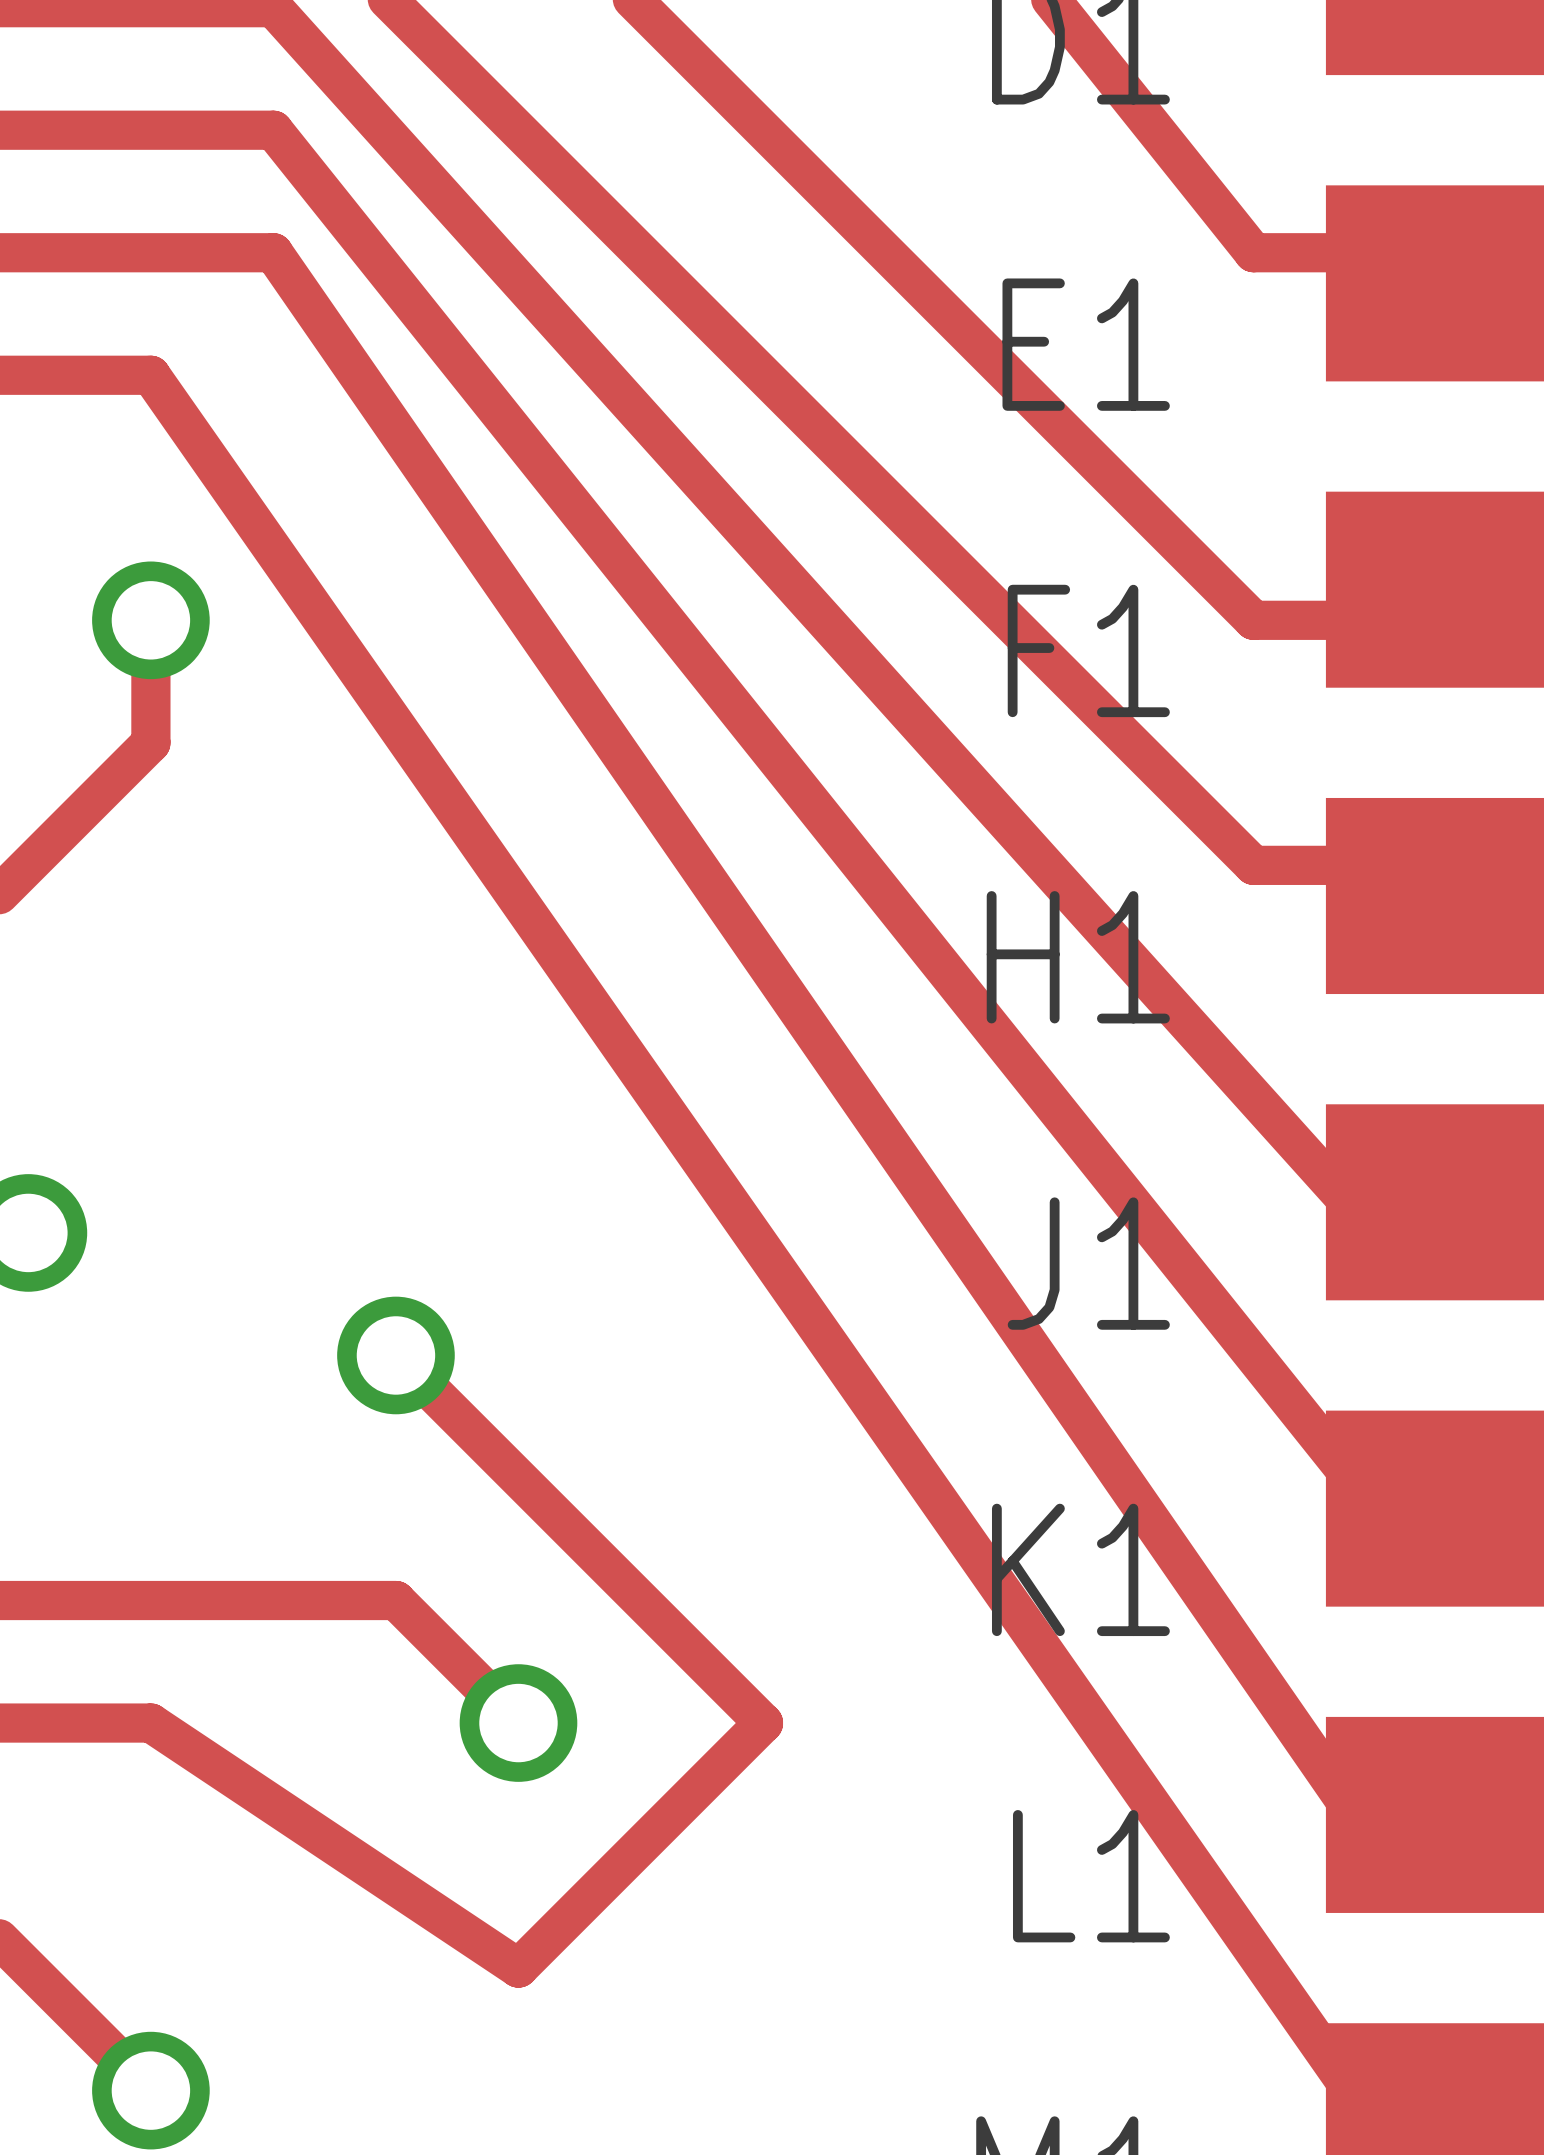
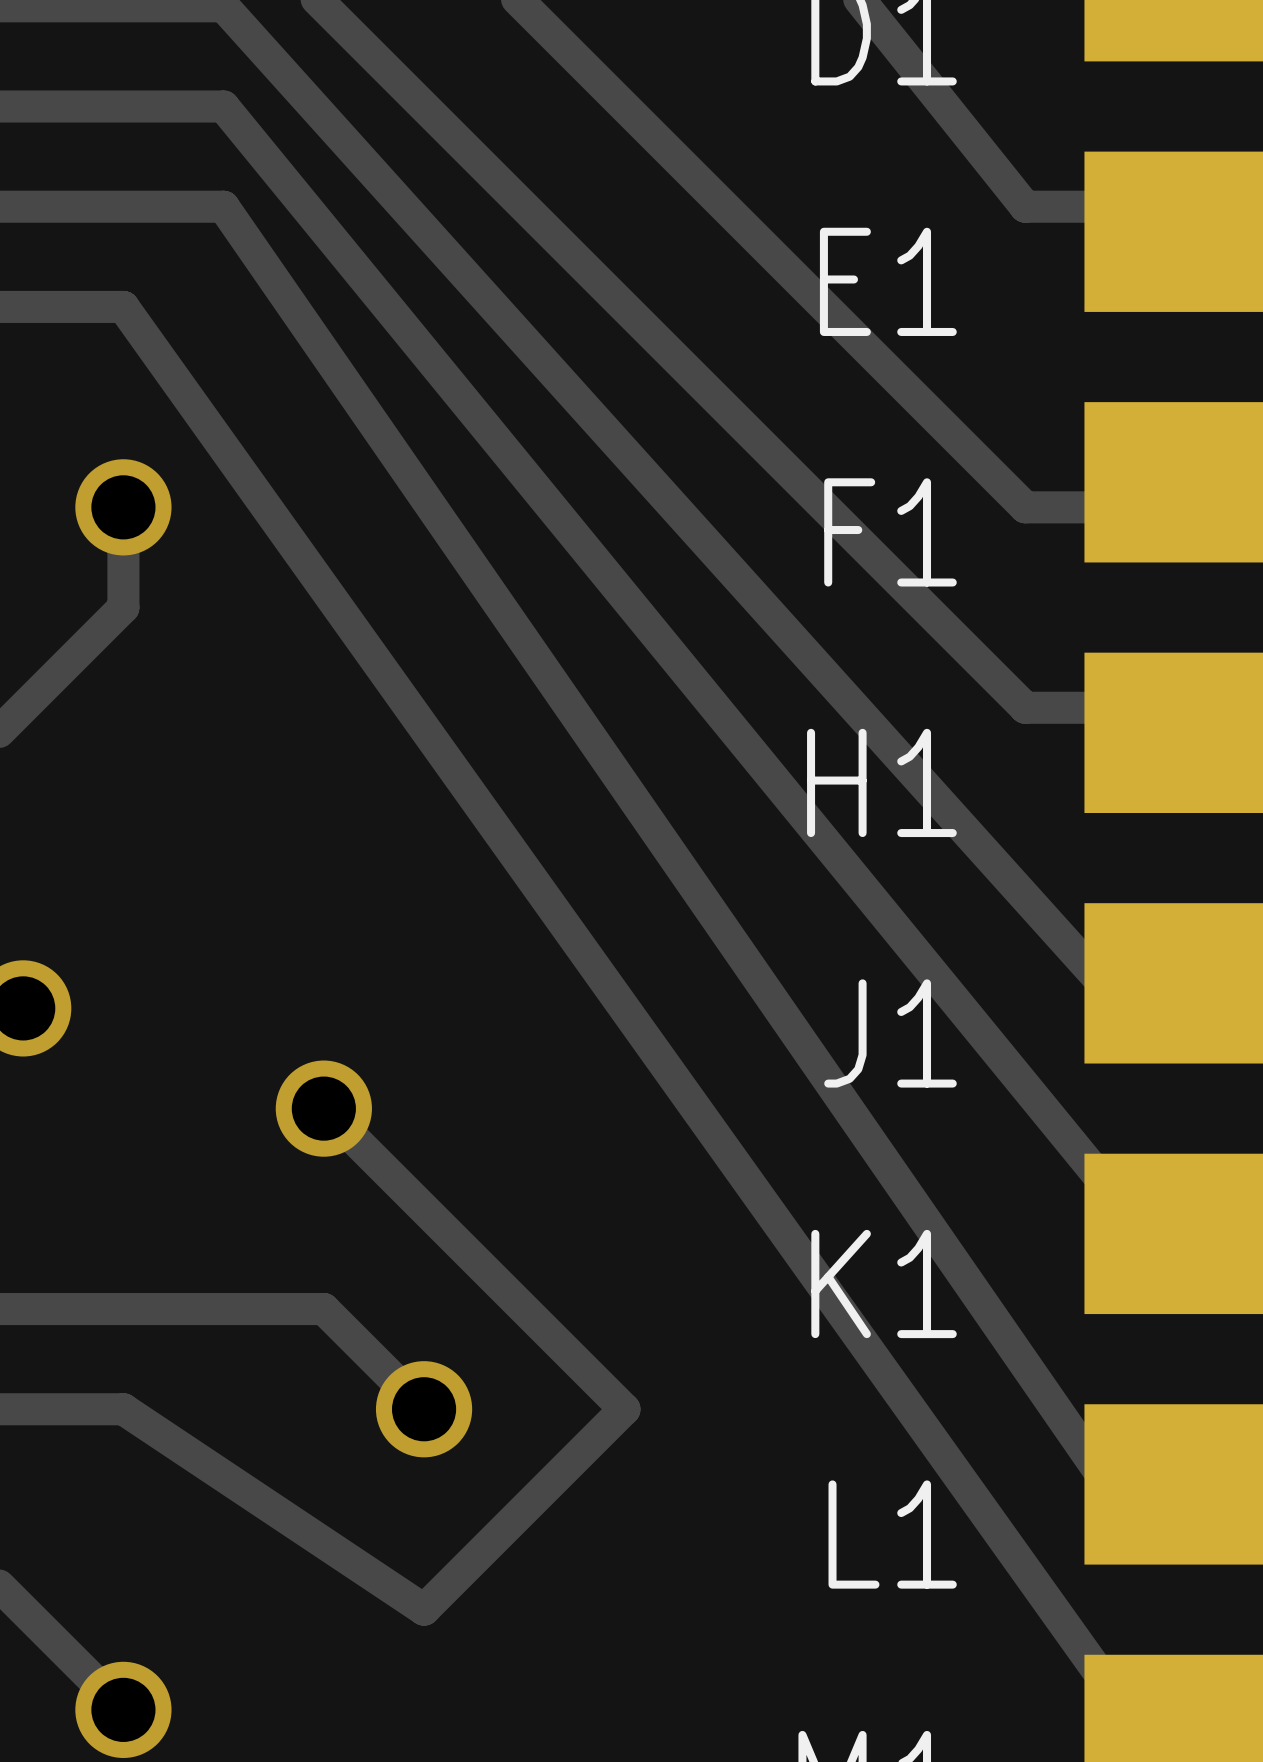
track: (273, 130) (1351, 1477) (1376, 1477) -> (223, 106) (1125, 1208)
track: (150, 375) (1351, 2090) (1376, 2090) -> (123, 306) (1125, 1709)

